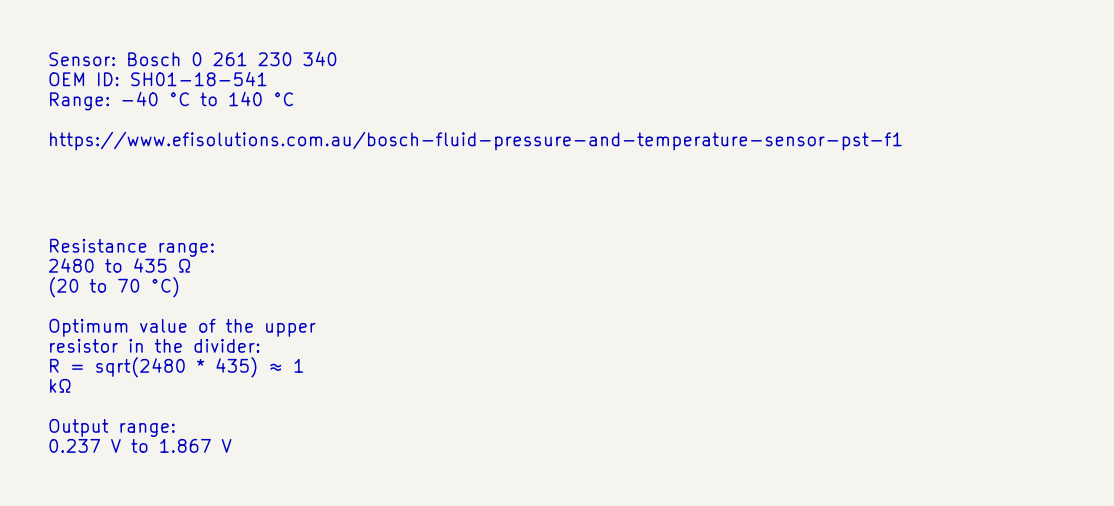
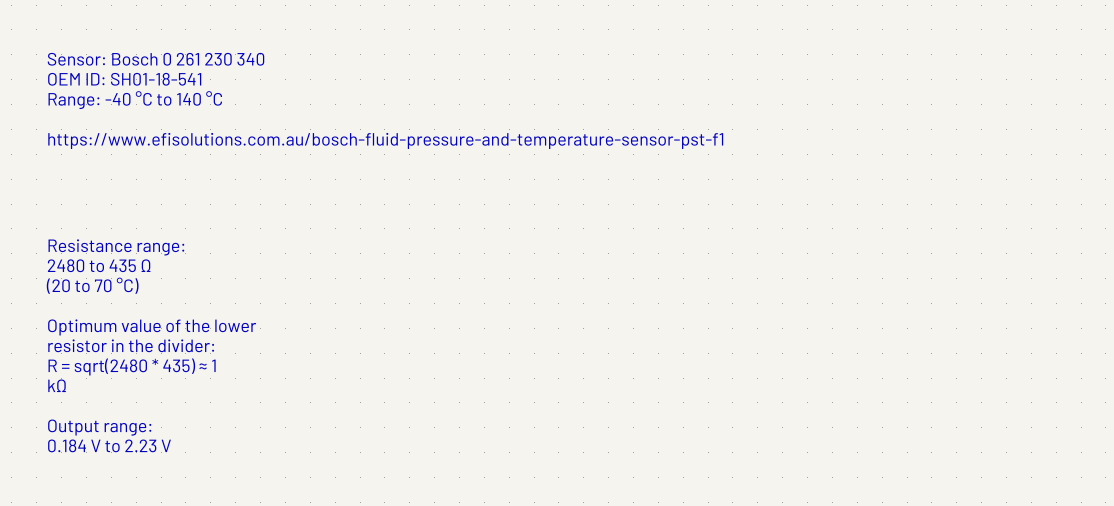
text: Optimum value of the upper (182, 327) -> Optimum value of the lower (152, 327)
text: 0.237 V to 1.867 V (140, 445) -> 0.184 V to 2.23 V (109, 445)

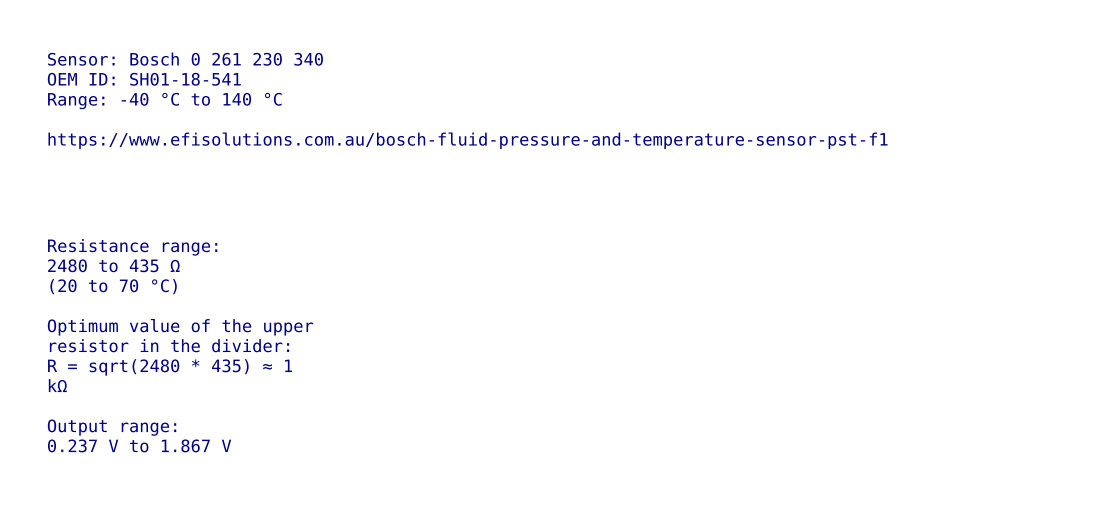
text: Optimum value of the lower (152, 327) -> Optimum value of the upper (180, 327)
text: 0.184 V to 2.23 V (109, 445) -> 0.237 V to 1.867 V (139, 445)

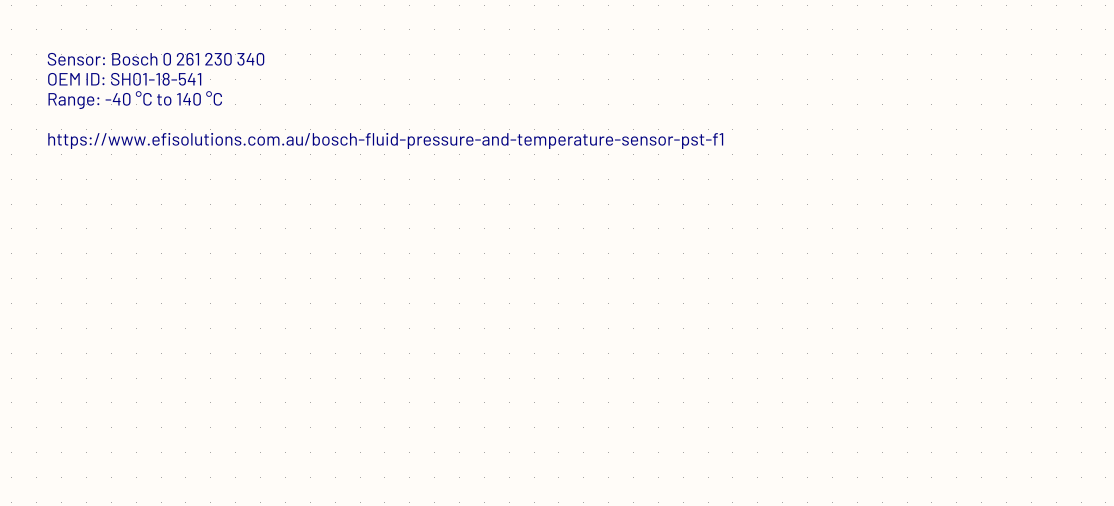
text: Resistance range: (132, 247) -> none
text: 2480 to 435 Ω (113, 265) -> none
text: (20 to 70 °C) (113, 286) -> none
text: Optimum value of the upper (180, 327) -> none
text: resistor in the divider: (169, 345) -> none
text: R = sqrt(2480 * 435) ≈ 1 (170, 367) -> none
text: kΩ (57, 385) -> none
text: Output range: (112, 427) -> none
text: 0.237 V to 1.867 V (139, 445) -> none

